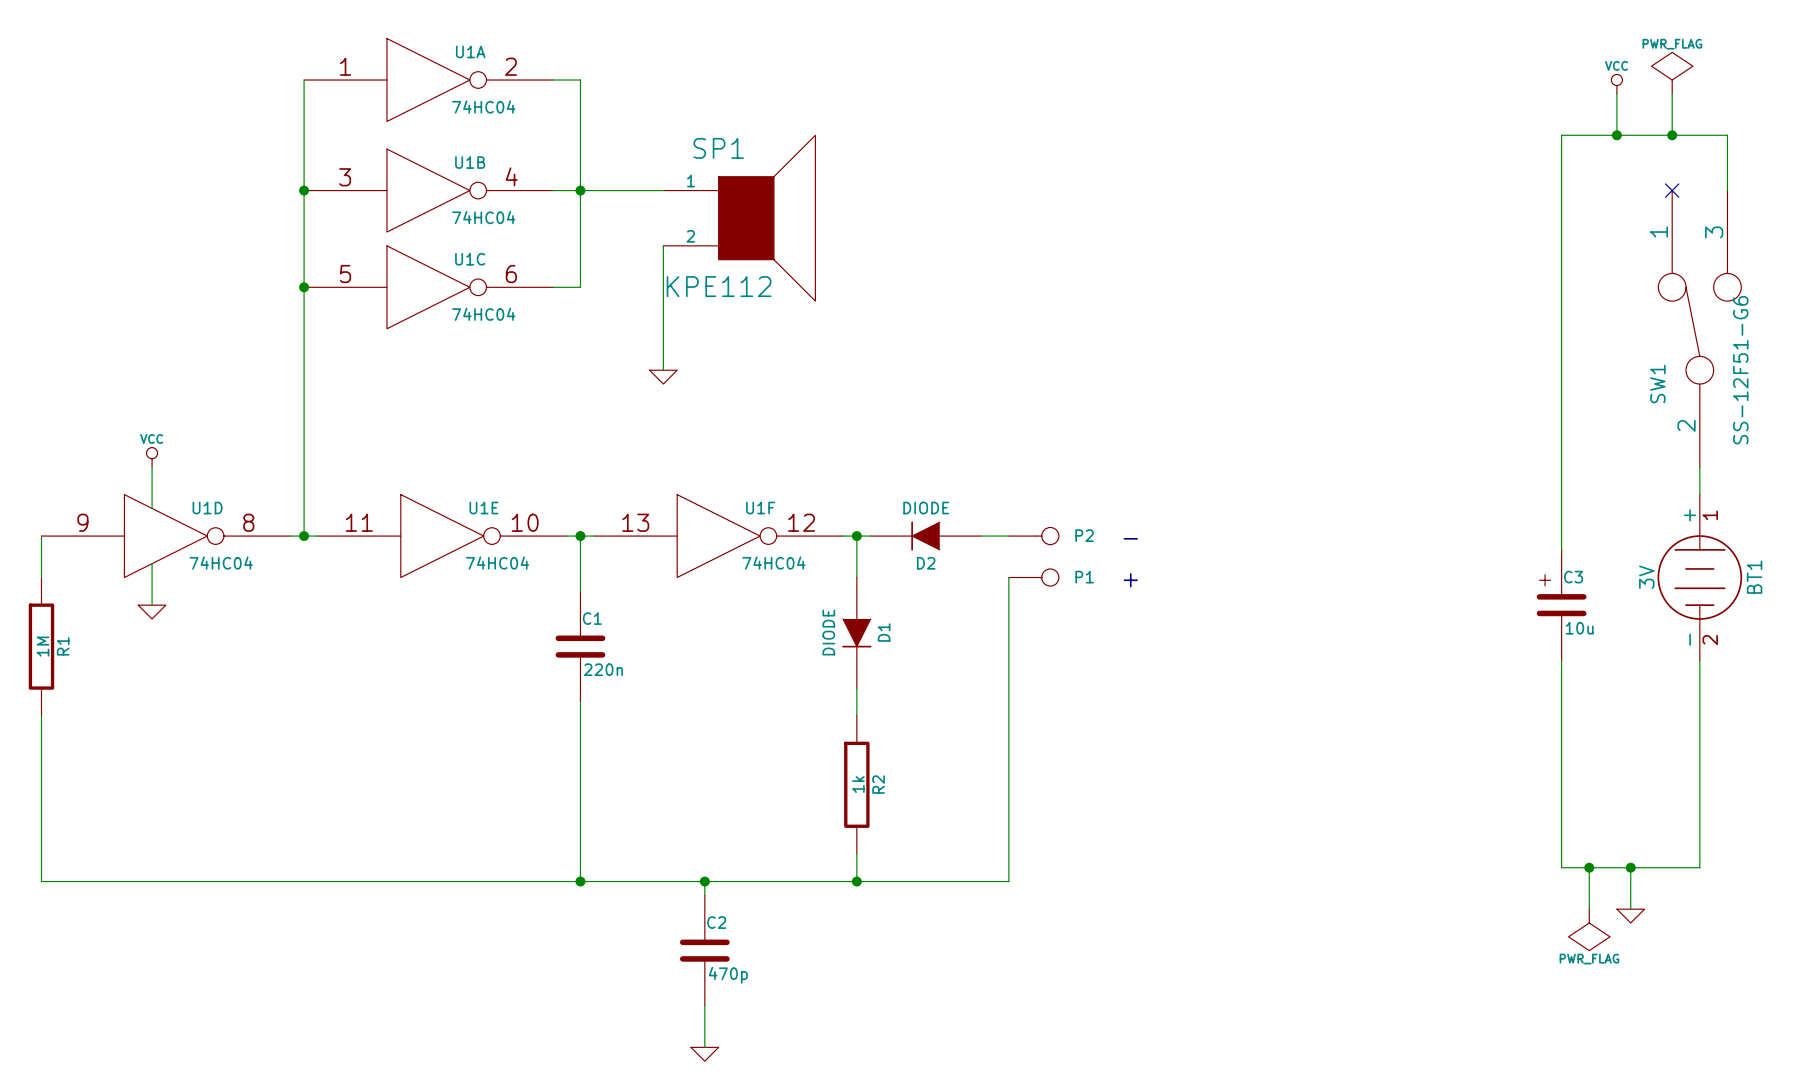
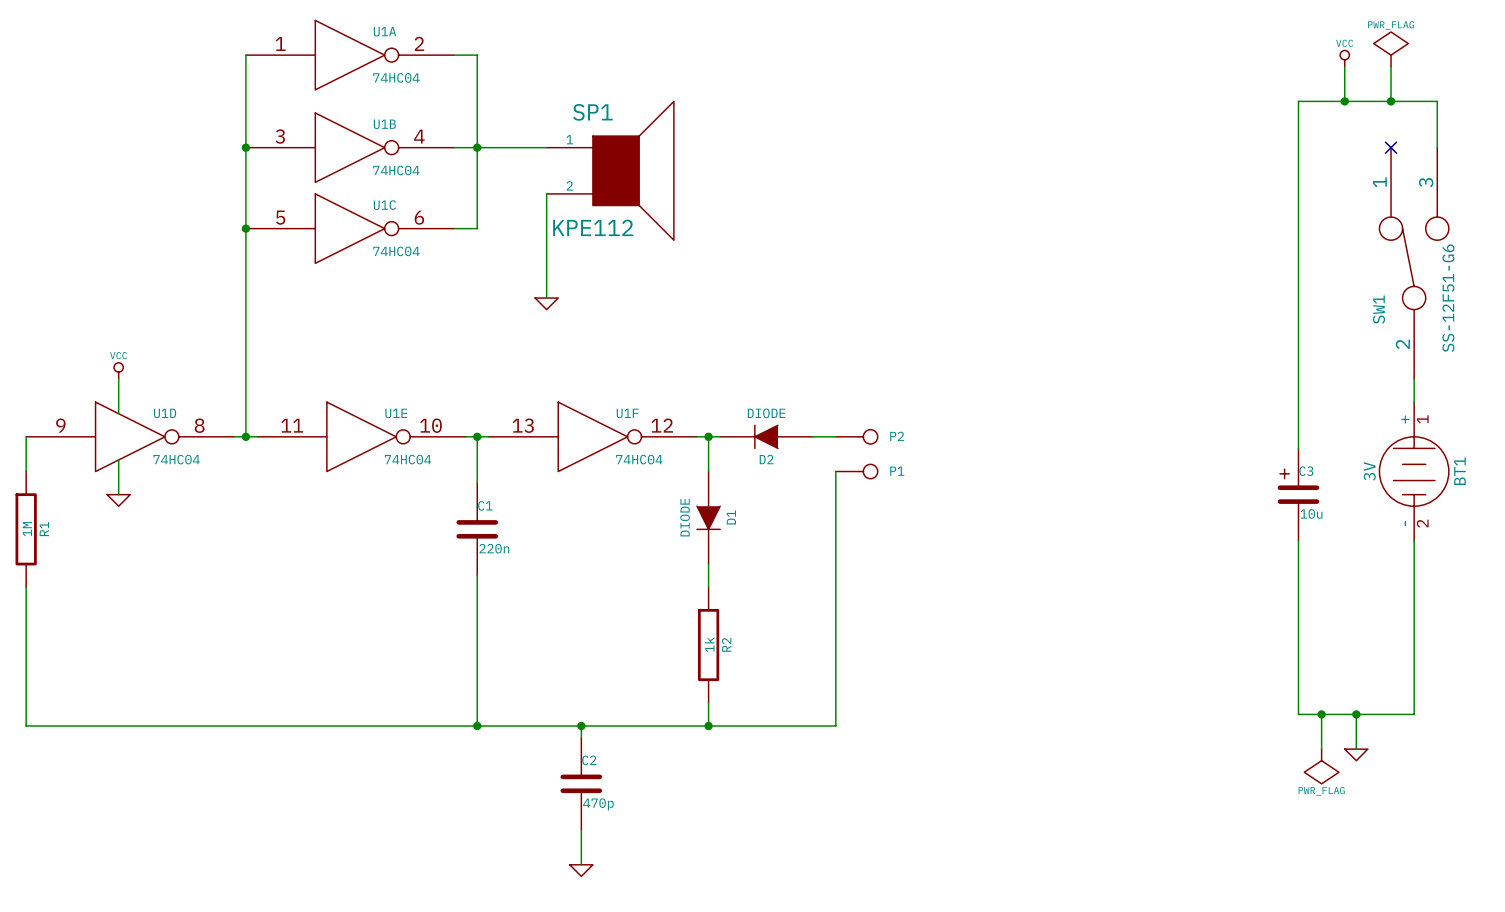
text: - (1130, 538) -> none
text: + (1130, 580) -> none

